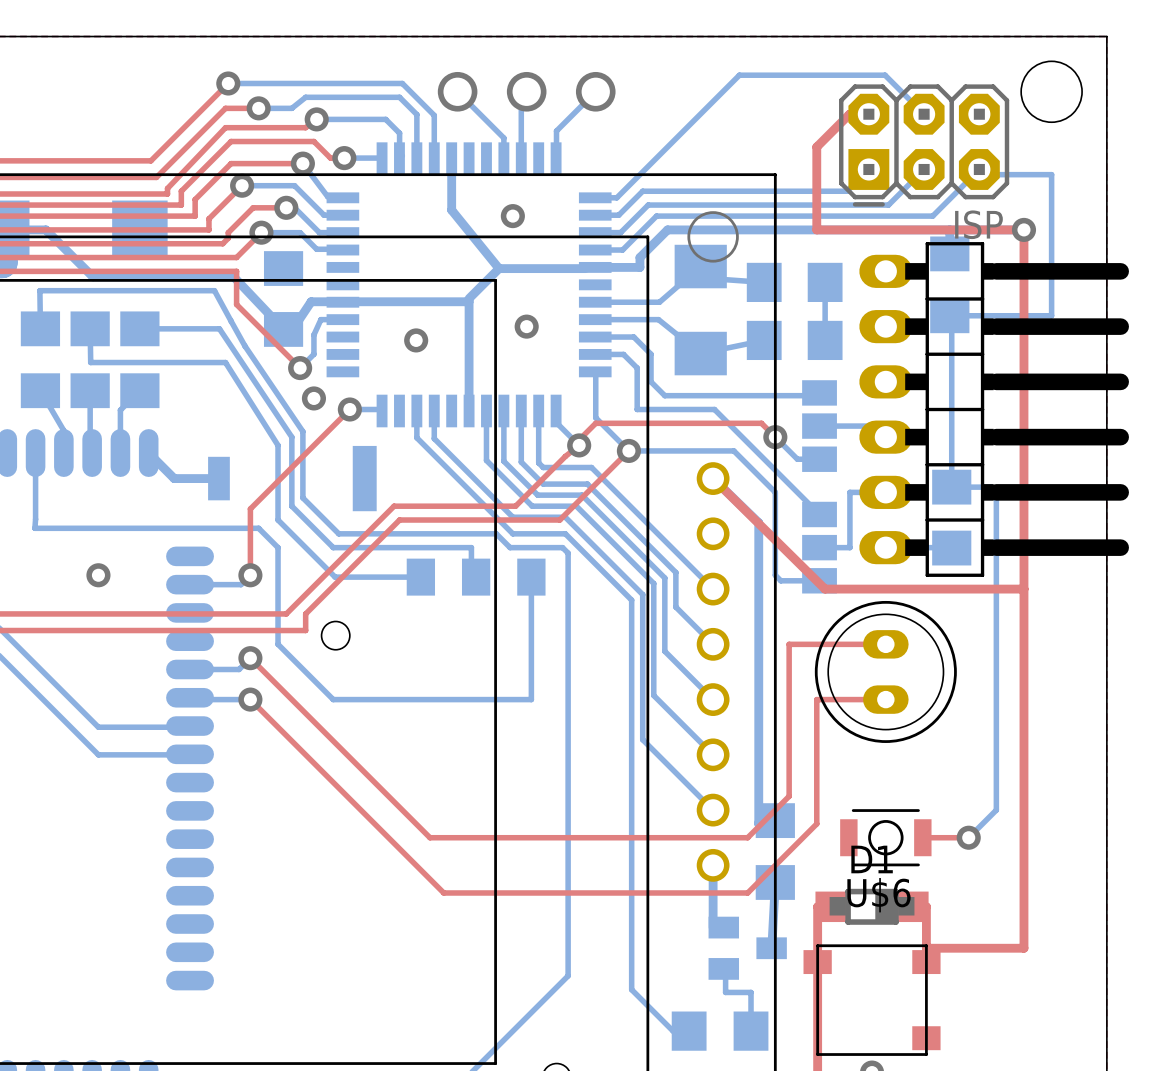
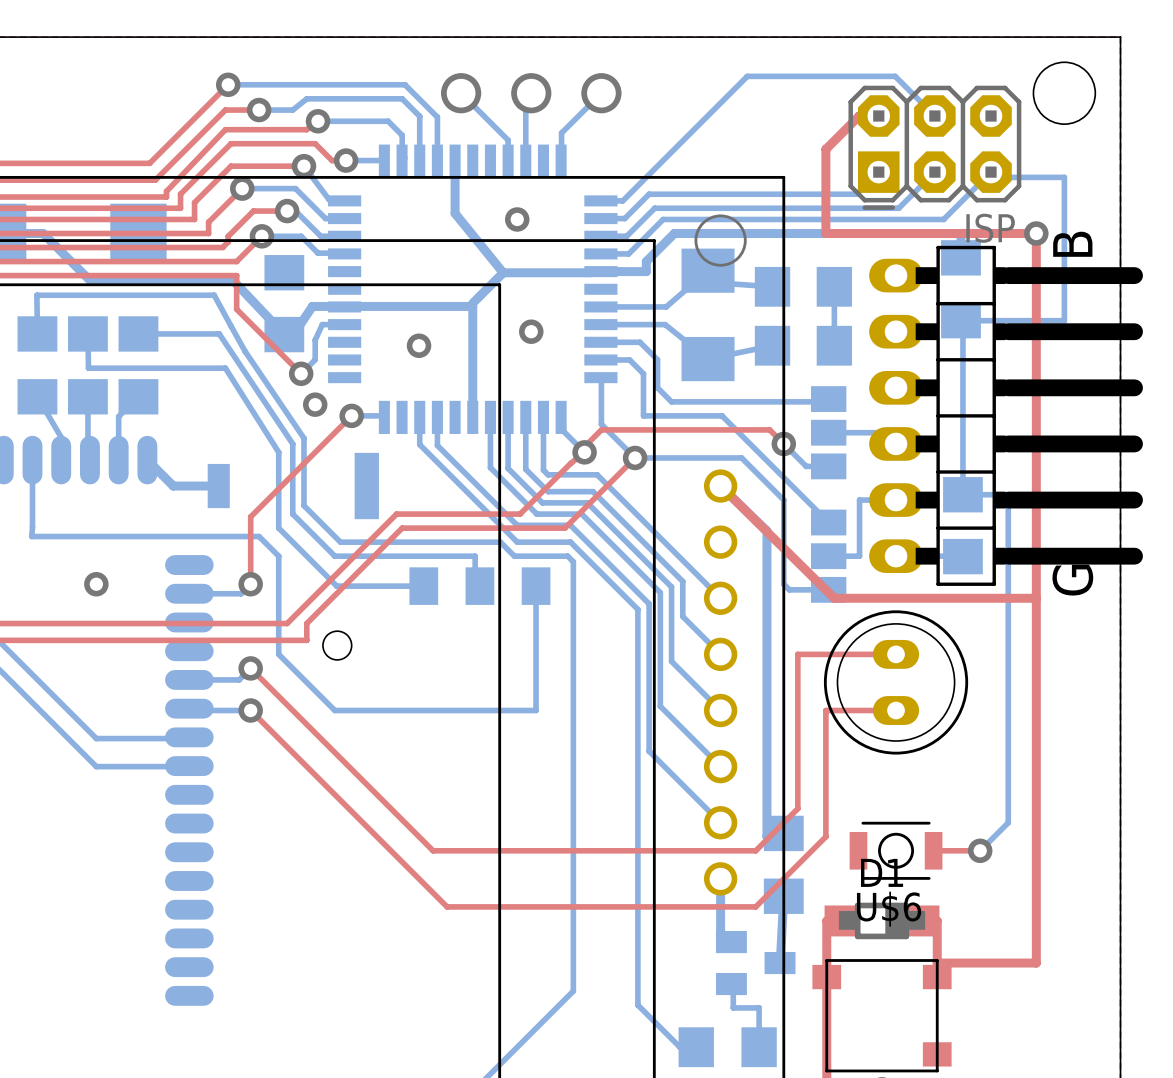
text: none -> B (1072, 244)
text: none -> G (1072, 580)

